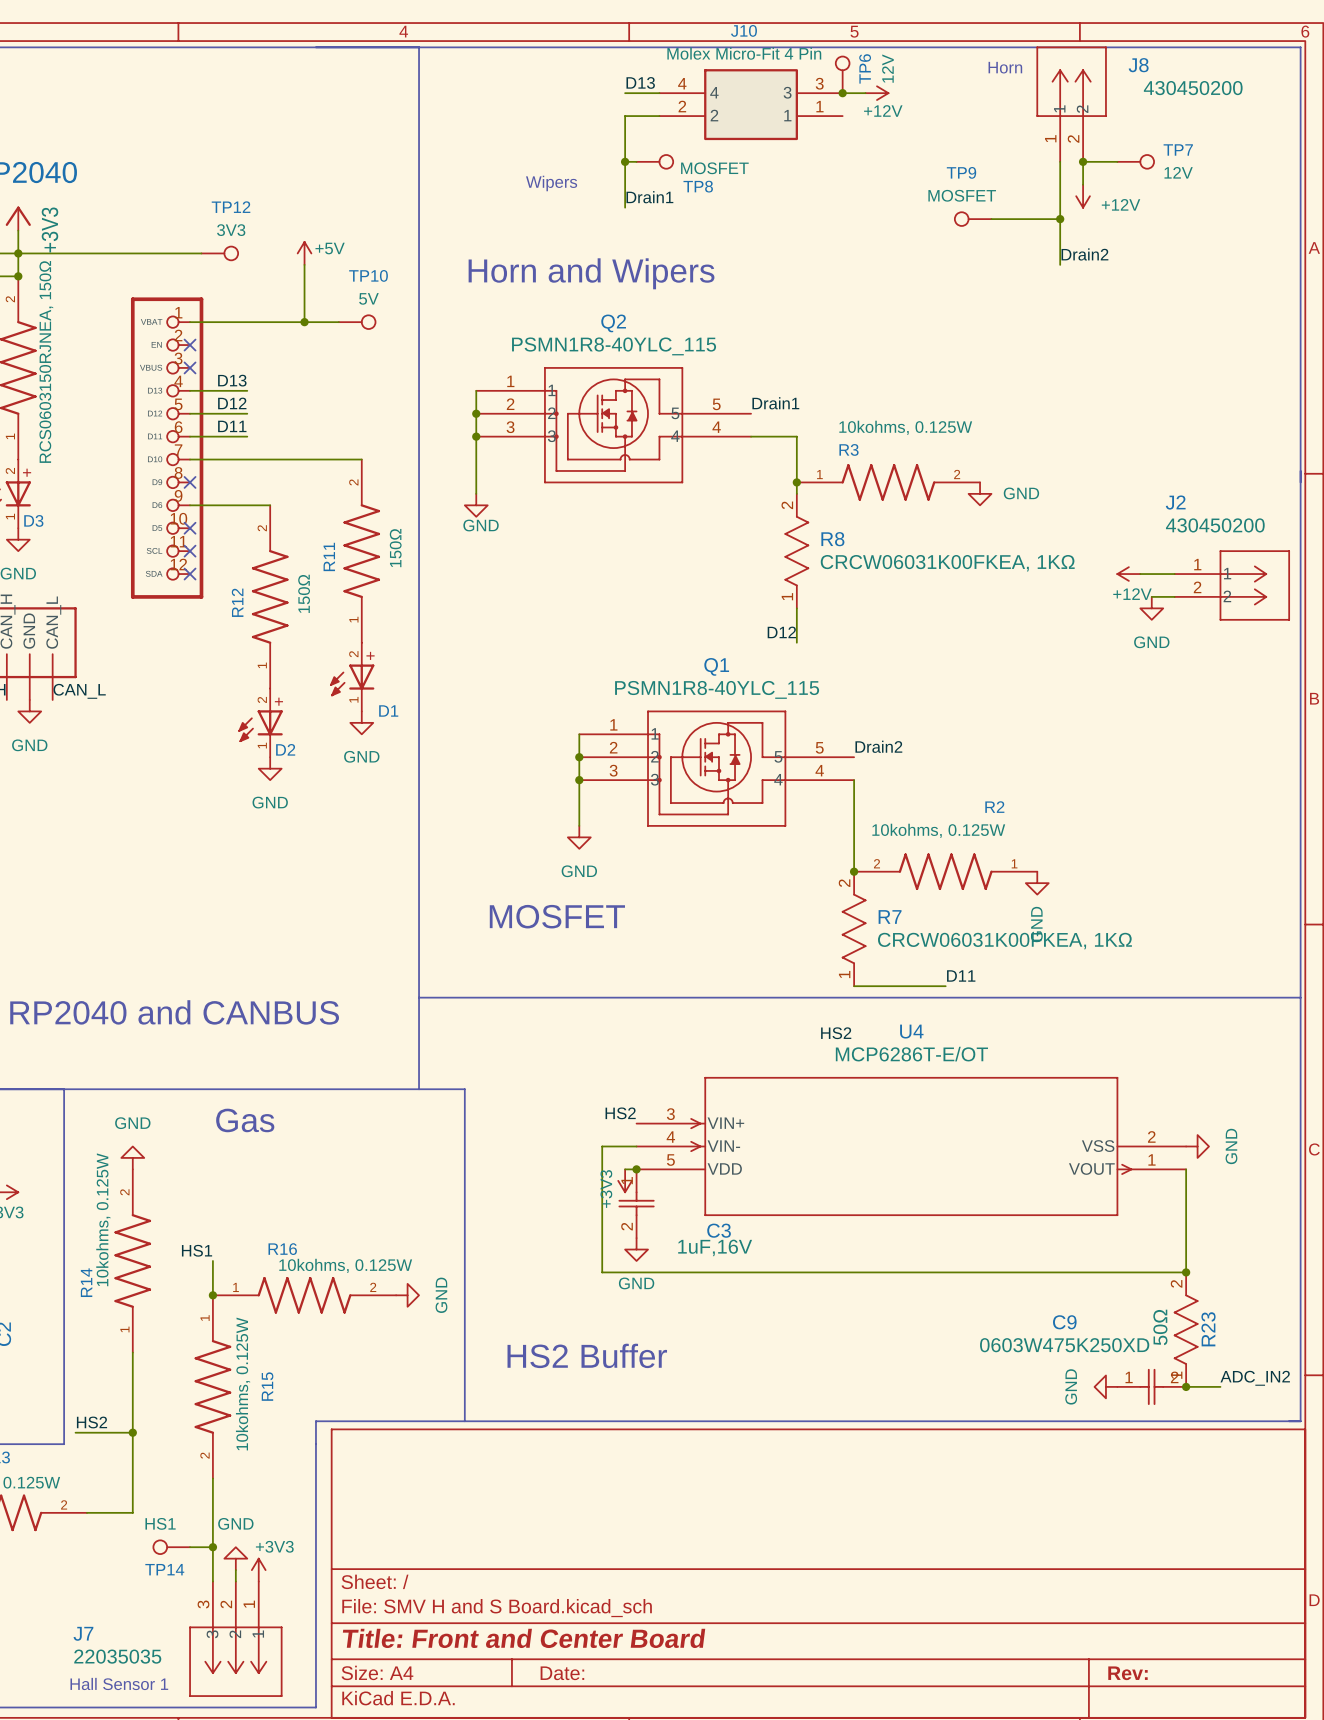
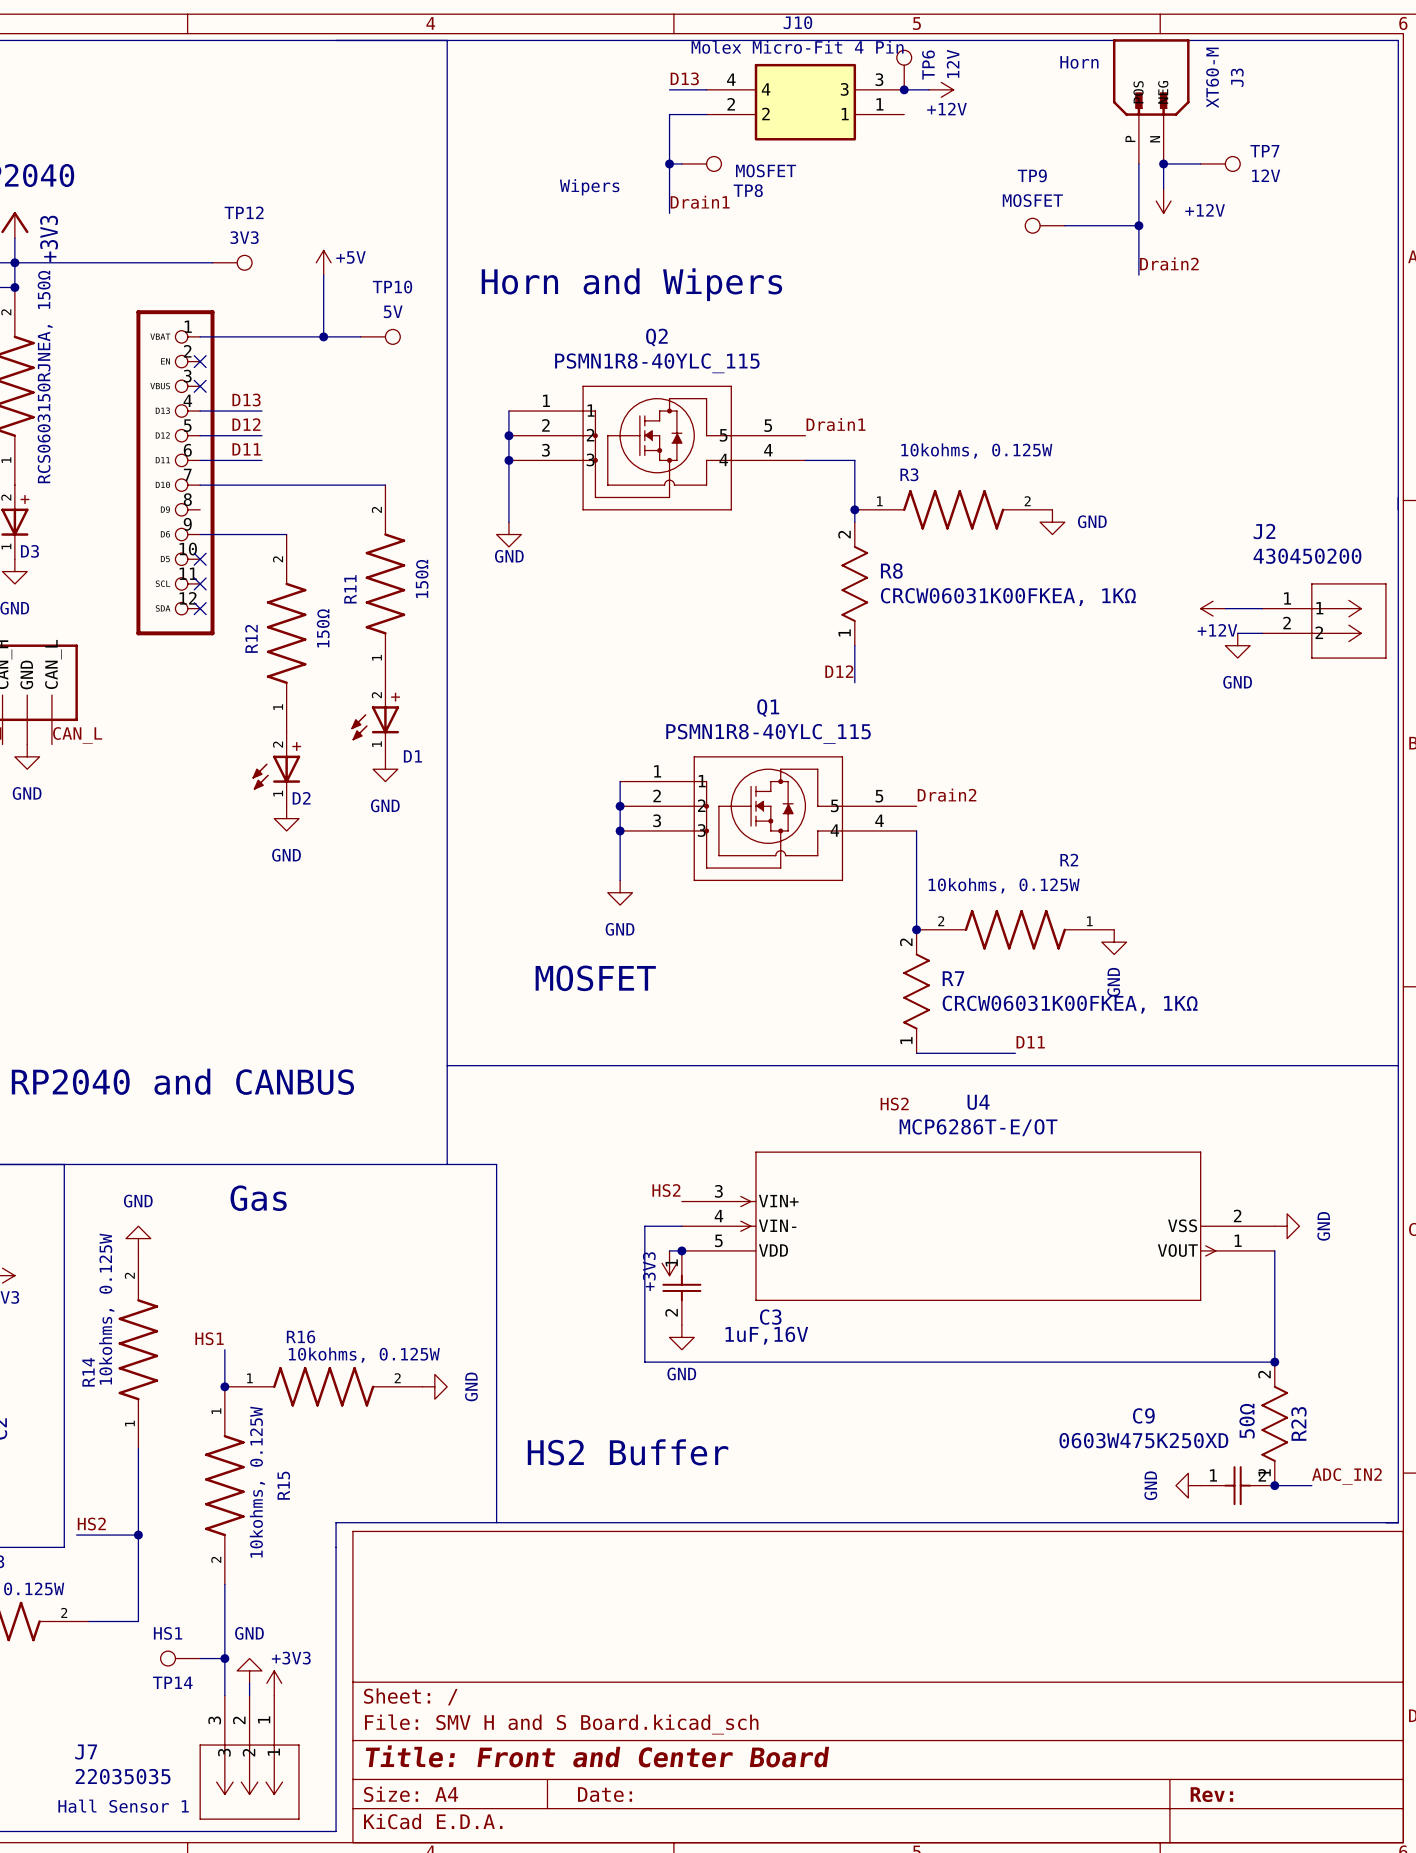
J8: 430450200 (1071, 104) -> none
J3: none -> XT60-M (1151, 101)
no-connect mark: (190, 482) -> none

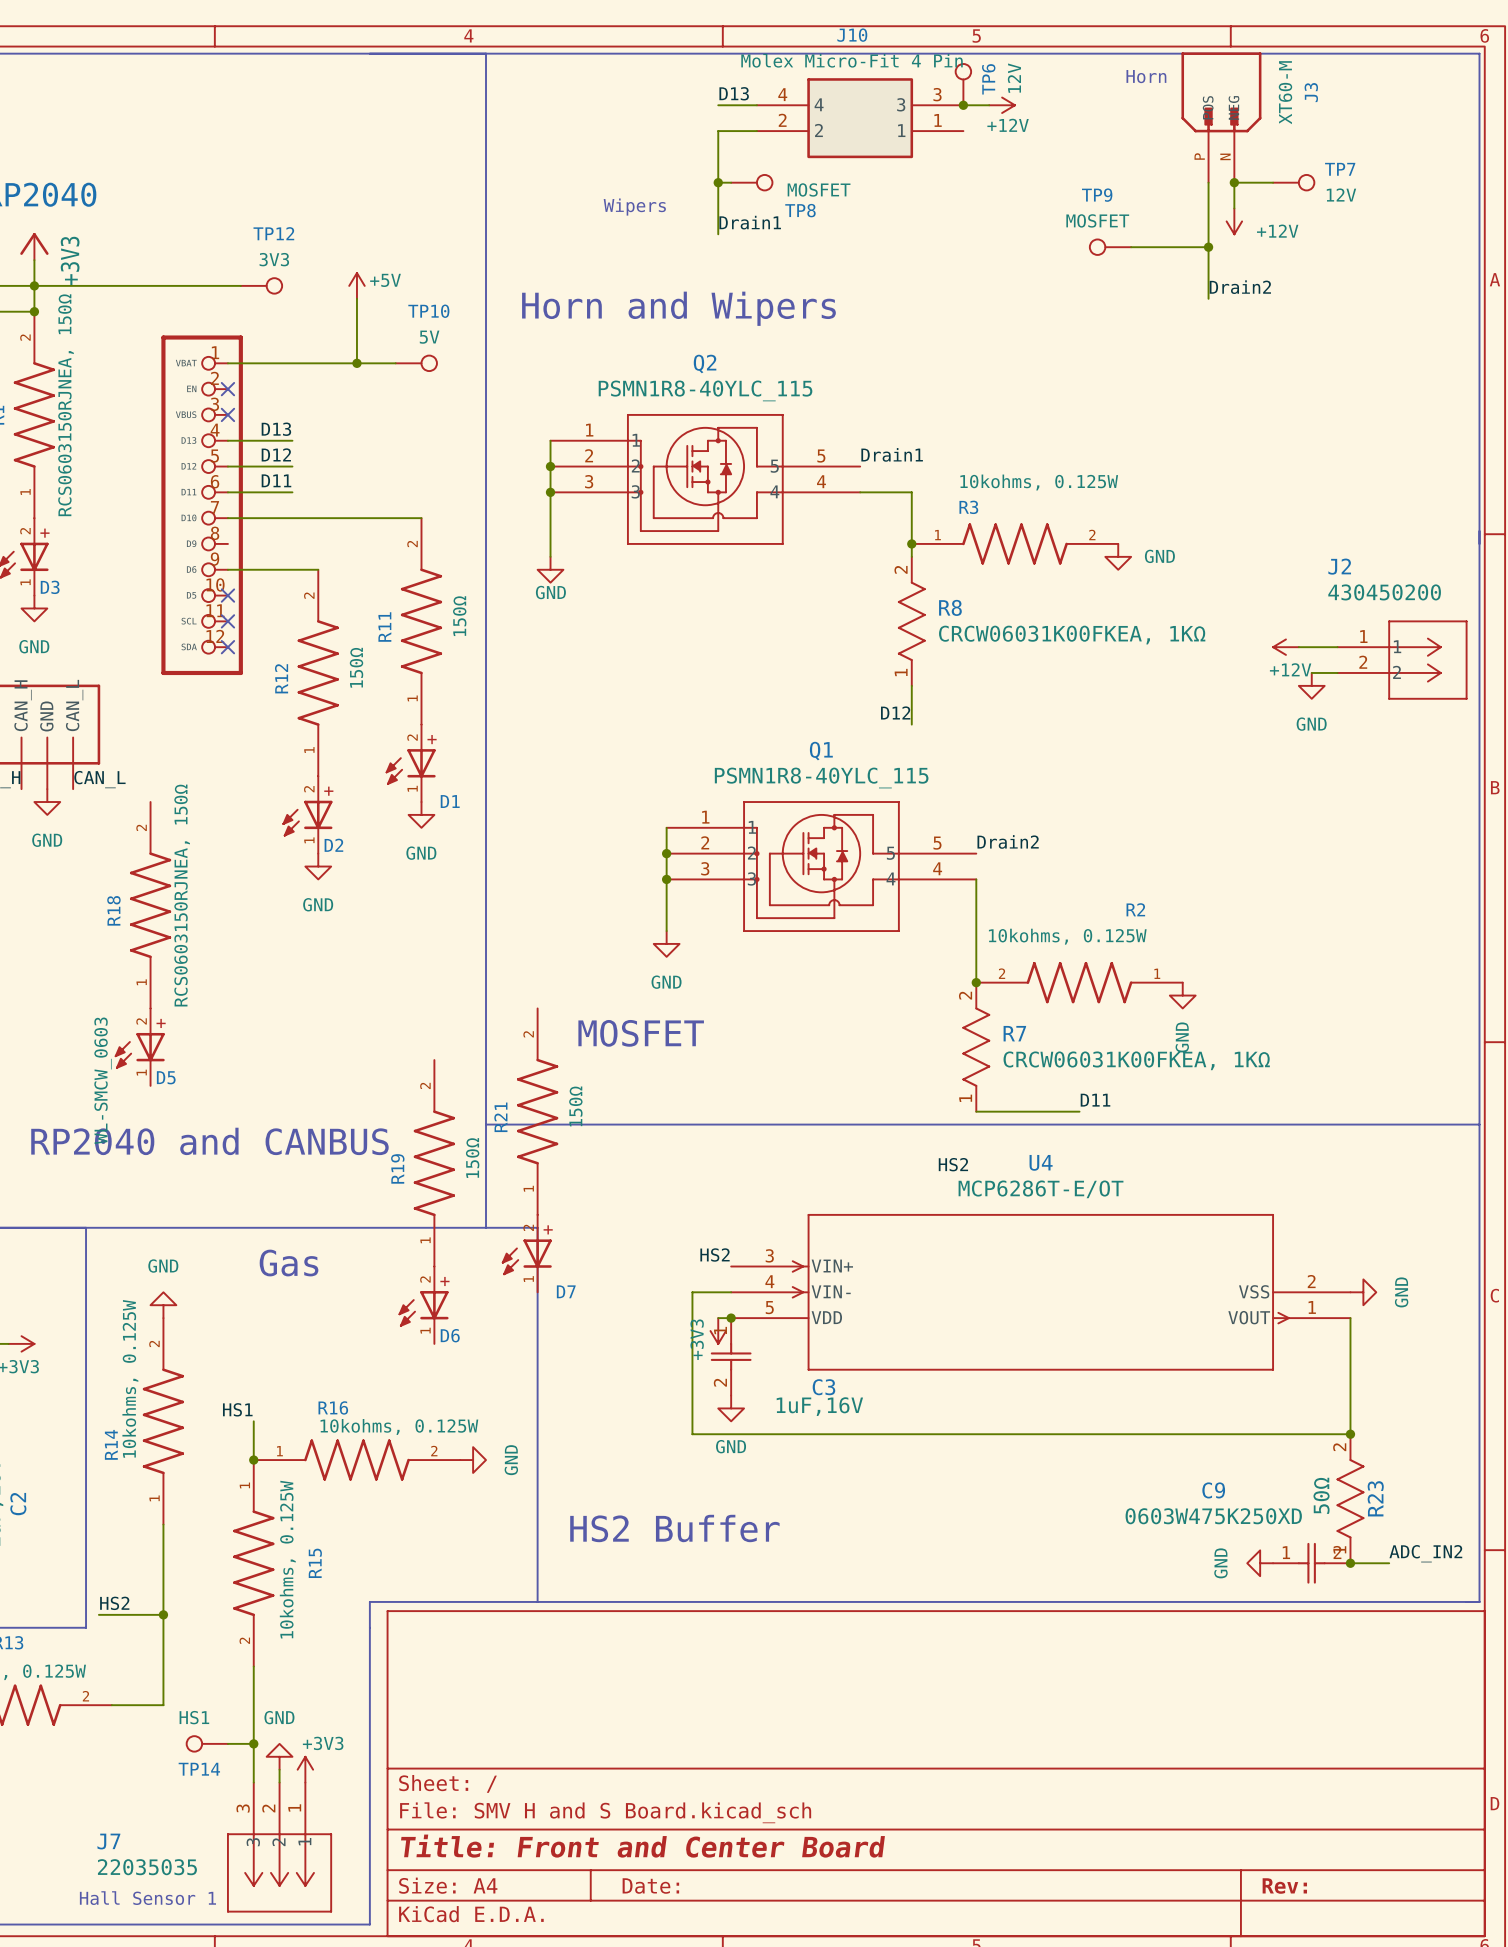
R18: none -> RCS0603150RJNEA, 150Ω (150, 905)
D5: none -> WL-SMCW_0603 (139, 1047)
R21: none -> 150Ω (537, 1111)
R19: none -> 150Ω (434, 1163)
D7: none -> (526, 1253)
D6: none -> (423, 1305)

